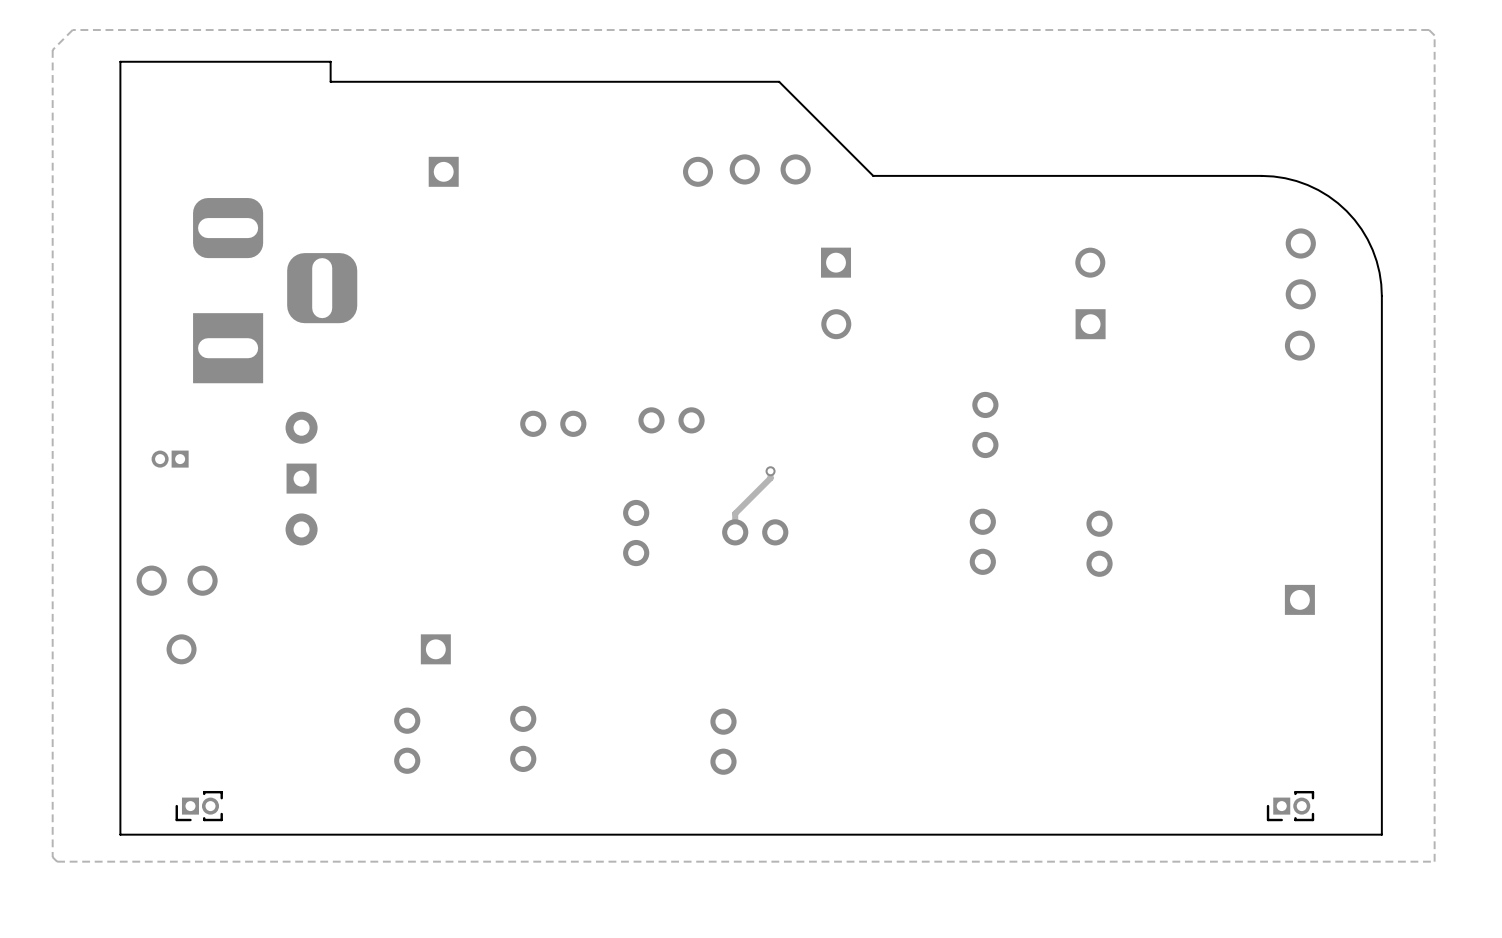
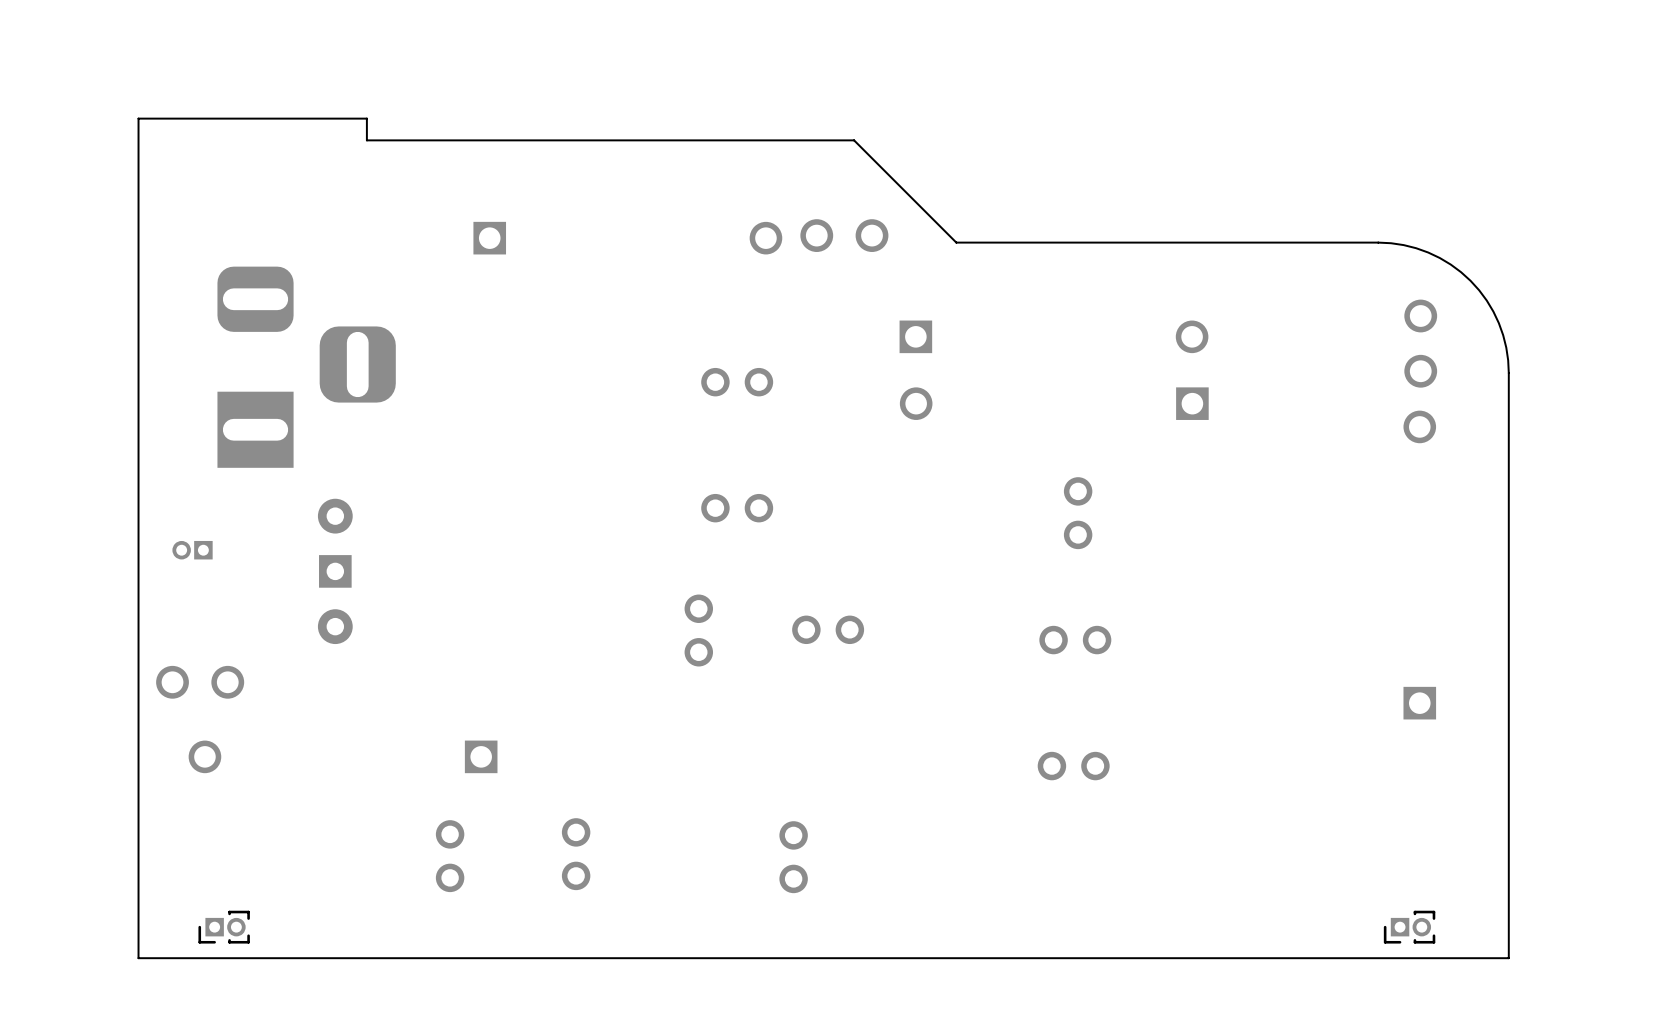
zone outline: (1429, 29) (1434, 35) (1434, 861) (57, 861) (52, 857) (52, 49) (72, 29) (1429, 29) -> none
part position: (553, 423) -> (737, 382)
track: (770, 471) (770, 478) (735, 513) (735, 532) -> none
via: (770, 471) -> none
part rotation: 0° (982, 541) -> 90° clockwise (1075, 640)
part rotation: 0° (1099, 543) -> 90° clockwise (1073, 766)
part position: (1099, 543) -> (1073, 766)

